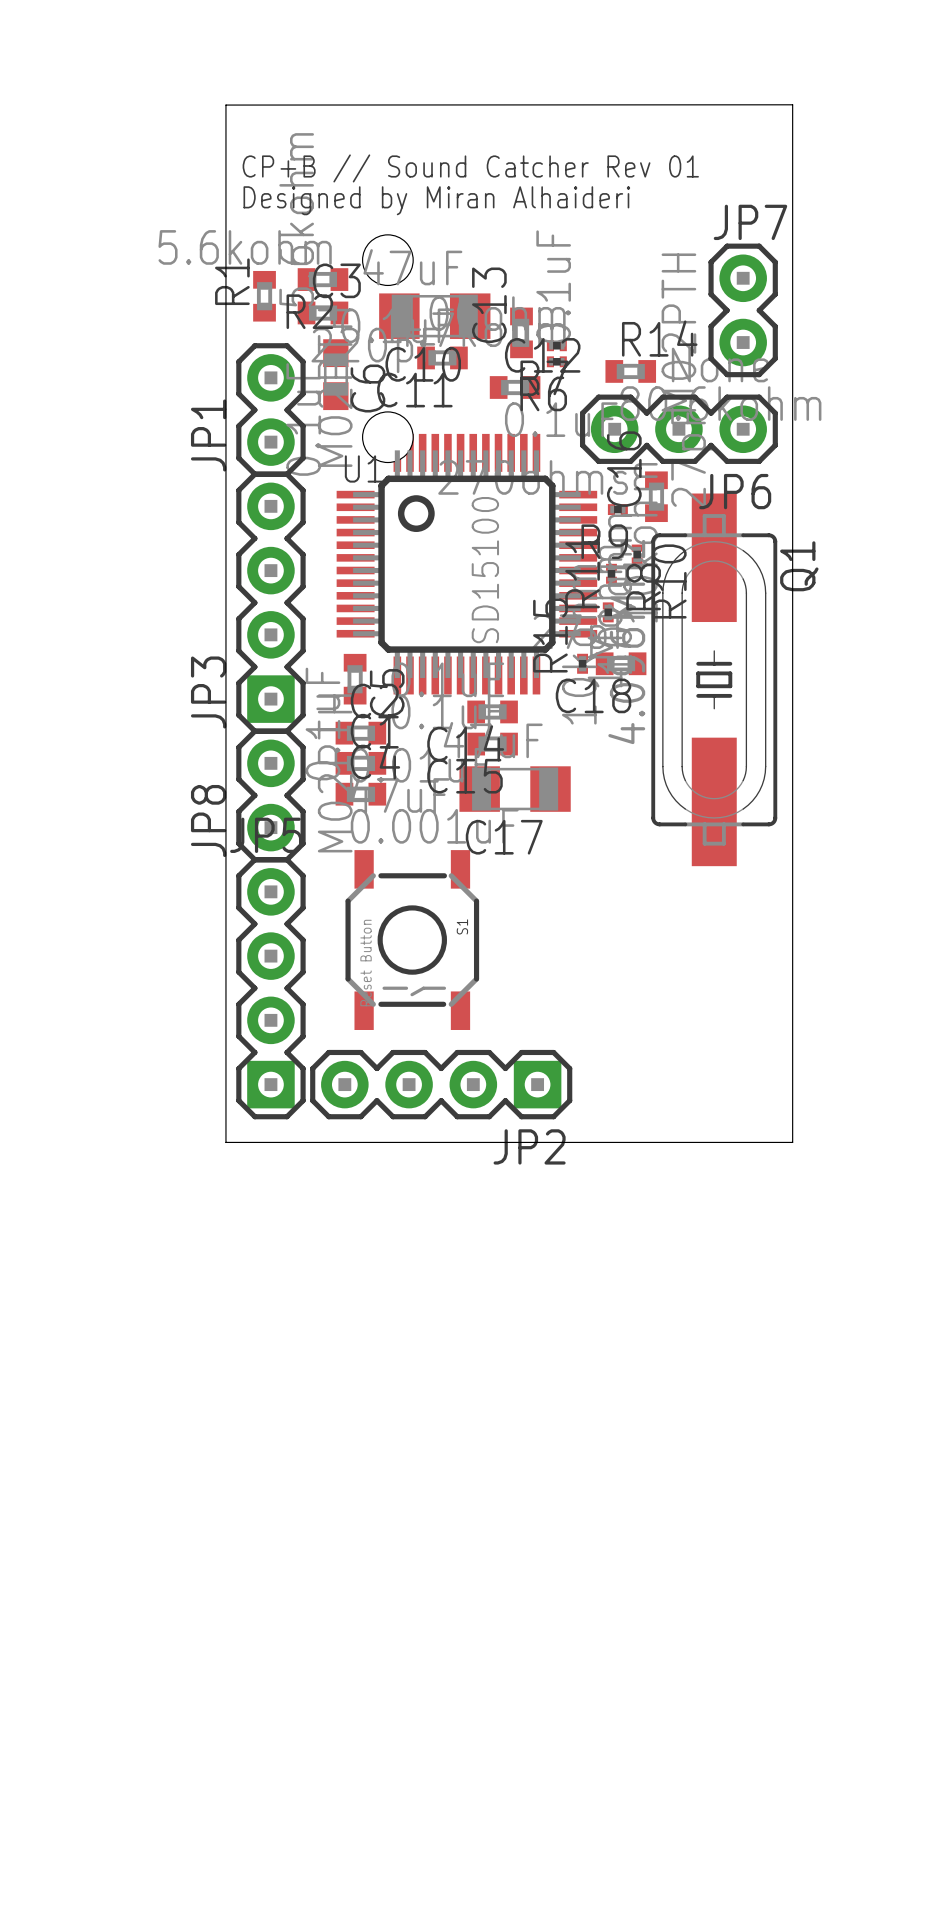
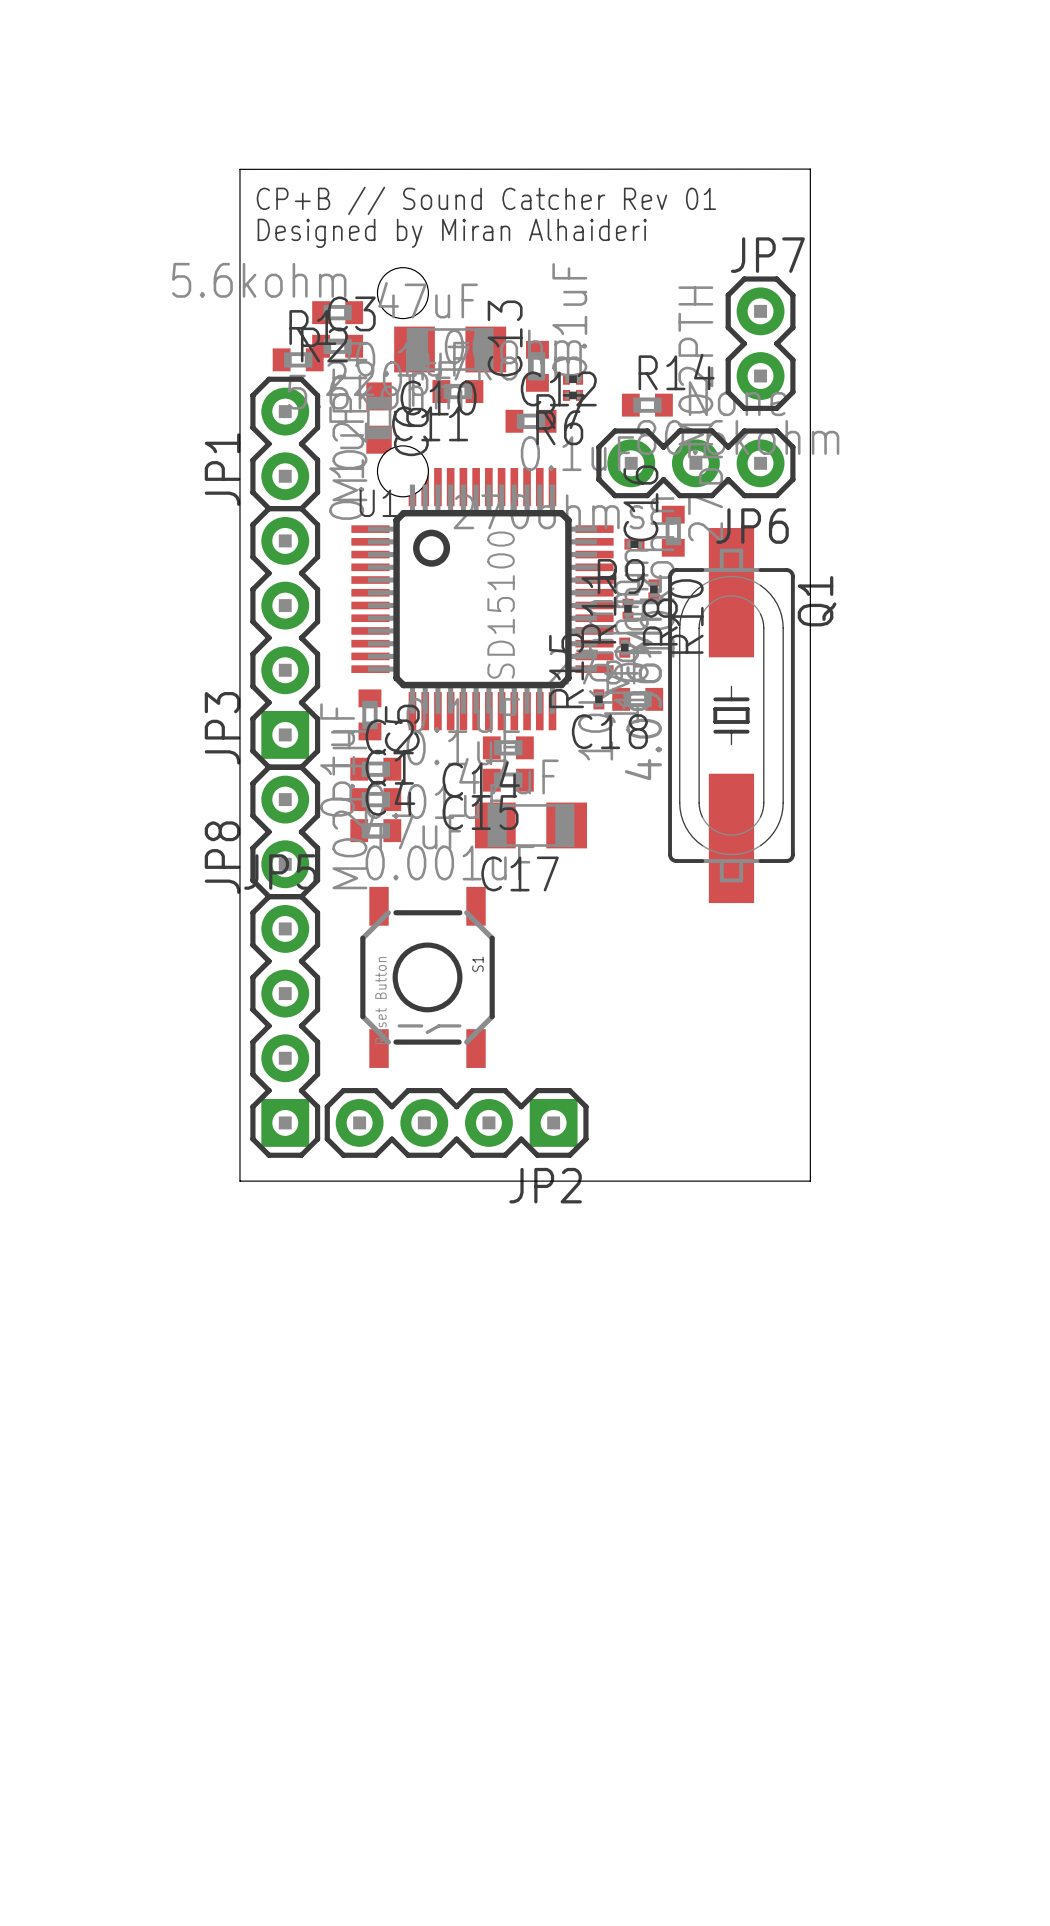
board edge: (792, 136) (792, 104) (225, 105) (225, 137) -> (810, 169) (239, 169)
R1 rotation: 0° (264, 296) -> 90° clockwise (298, 359)
R1 position: (264, 296) -> (298, 359)
C6 position: (335, 374) -> (379, 418)

